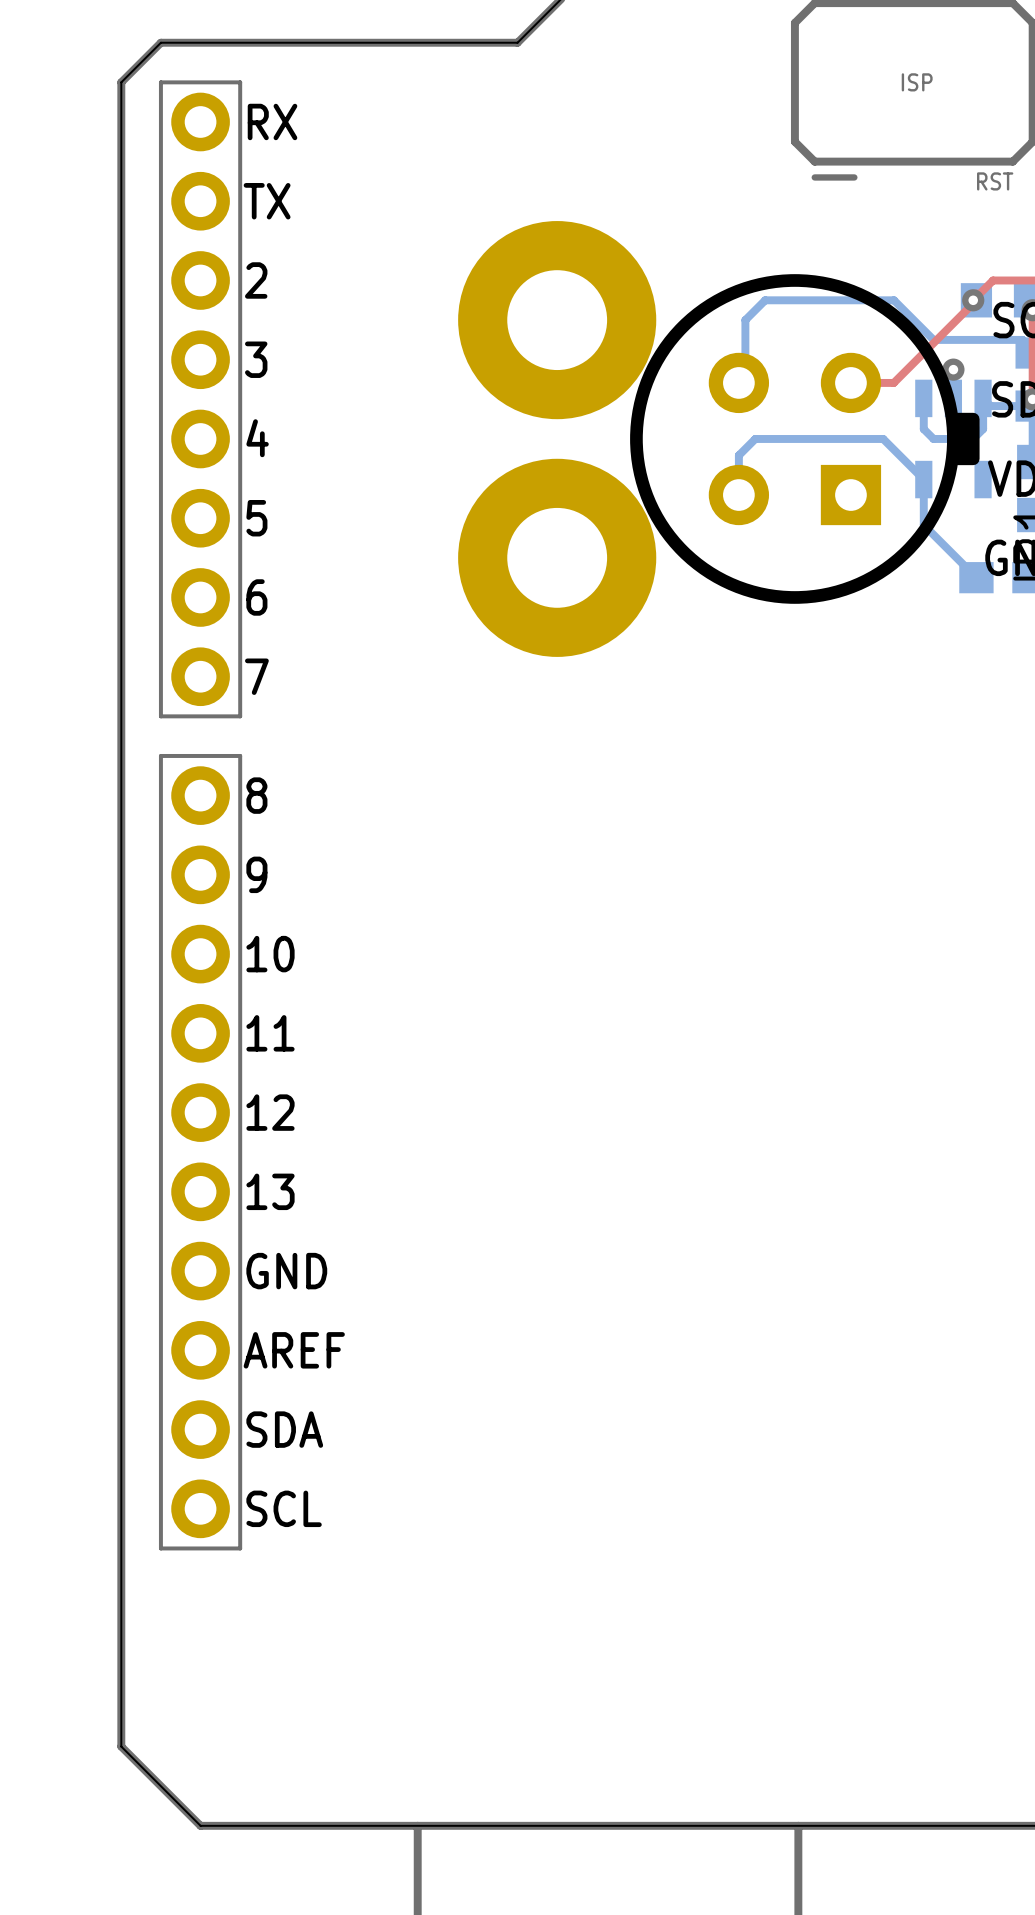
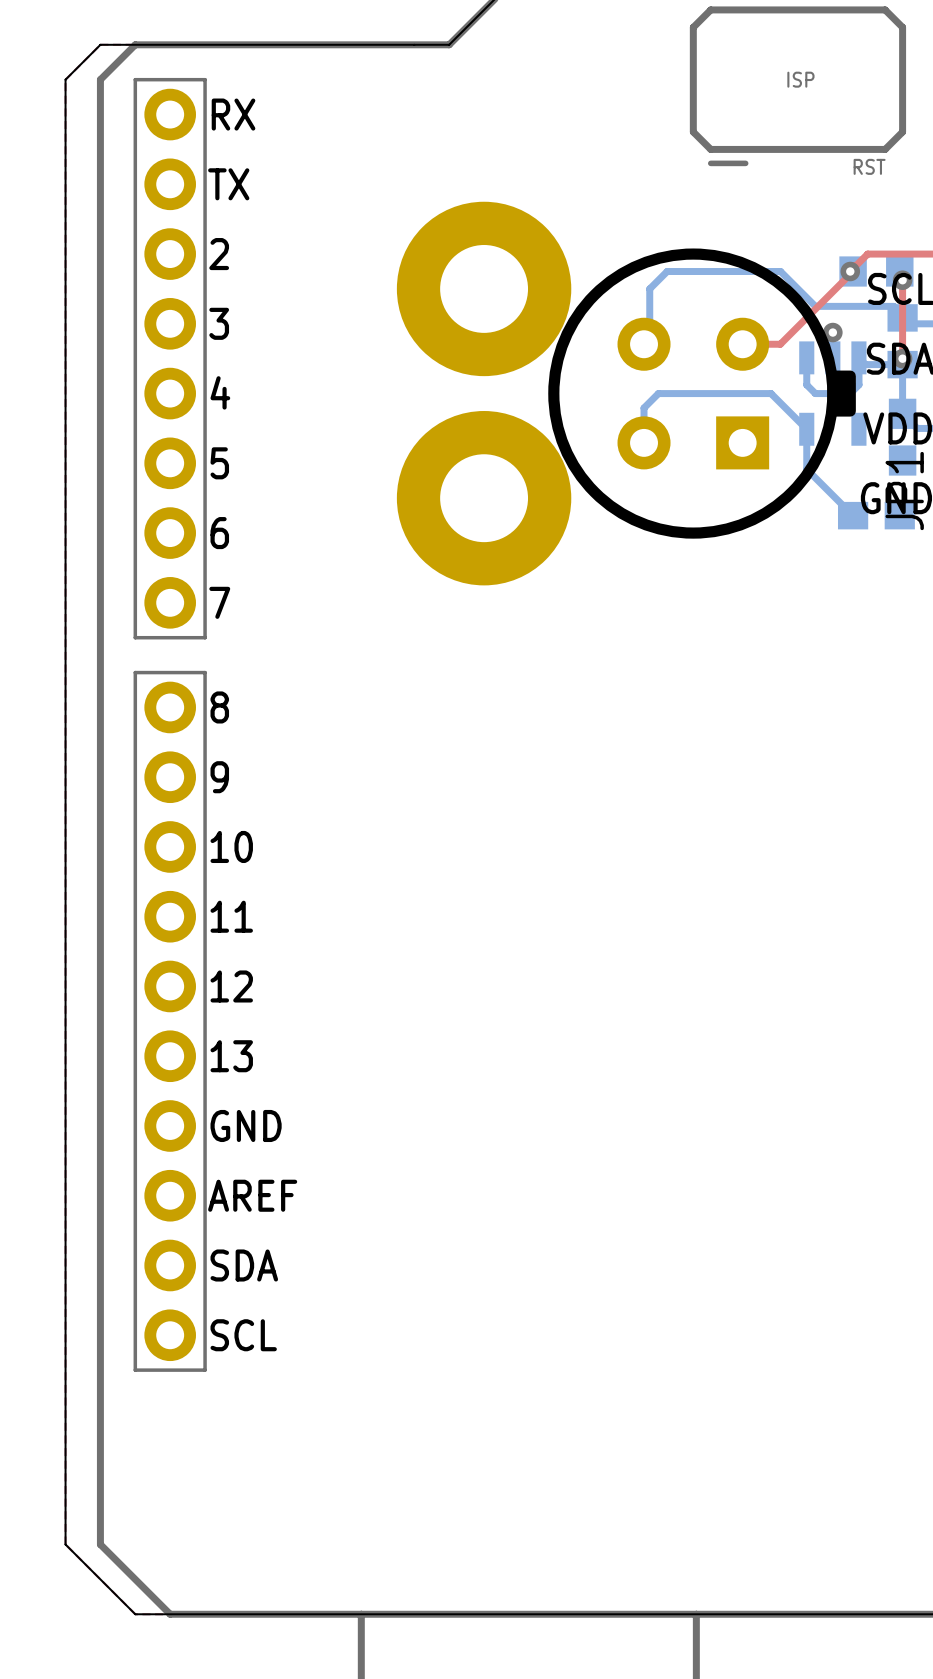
board edge: (160, 42) (121, 82) (121, 1746) (200, 1825) -> (135, 44) (100, 44) (65, 79) (65, 1544) (135, 1614) (170, 1614)

